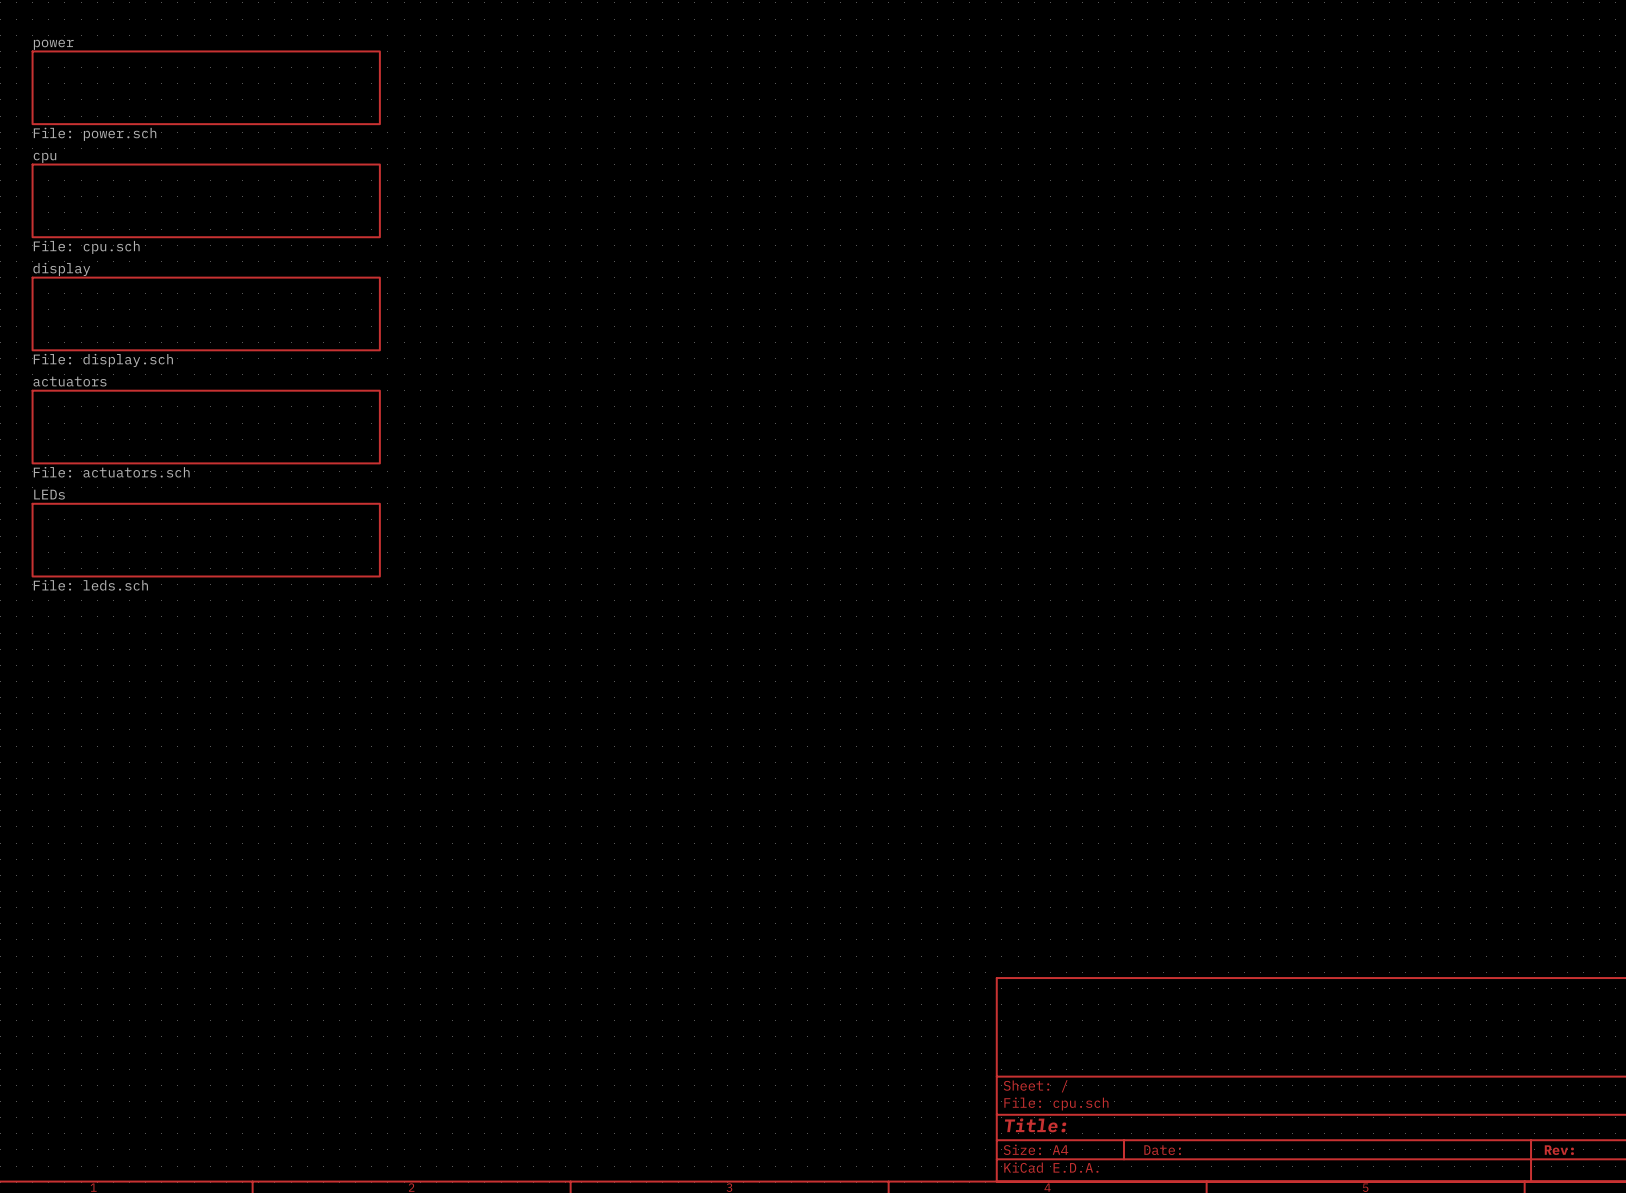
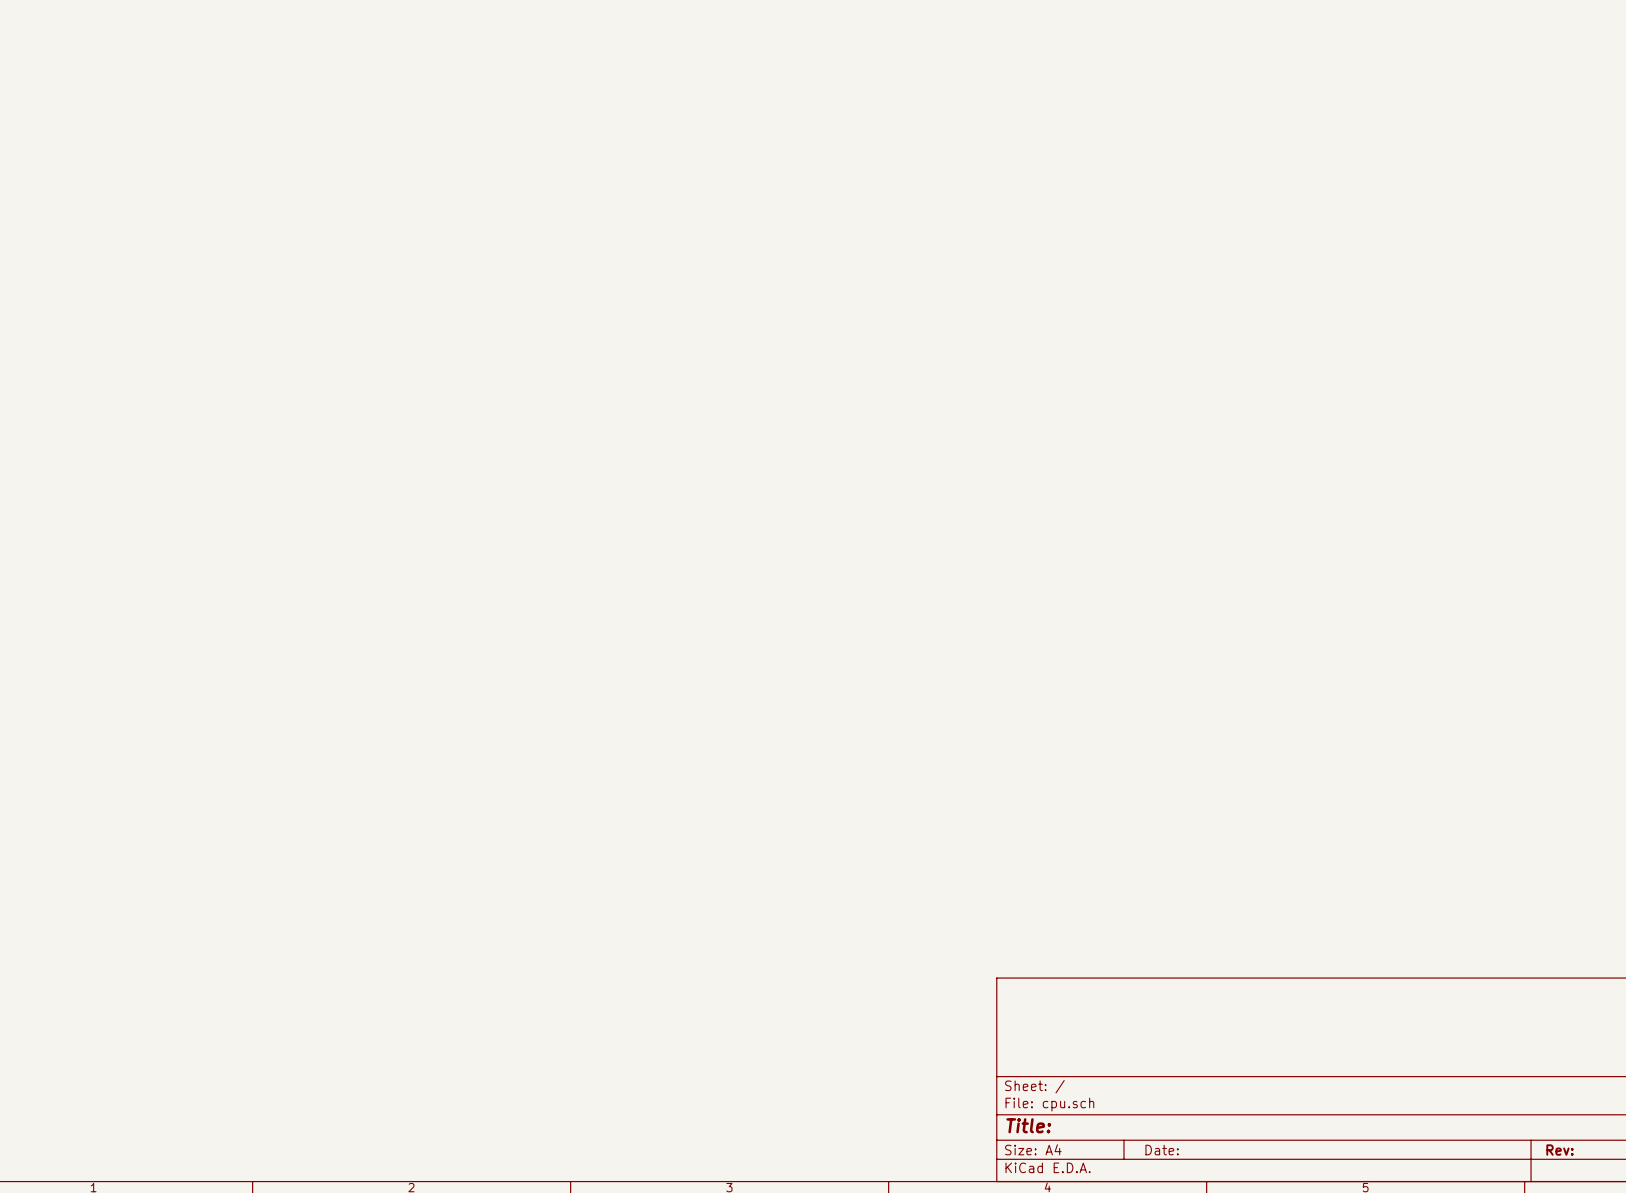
sheet power: File: power.sch (206, 87) -> none
sheet cpu: File: cpu.sch (206, 200) -> none
sheet display: File: display.sch (206, 313) -> none
sheet actuators: File: actuators.sch (206, 427) -> none
sheet LEDs: File: leds.sch (206, 540) -> none

